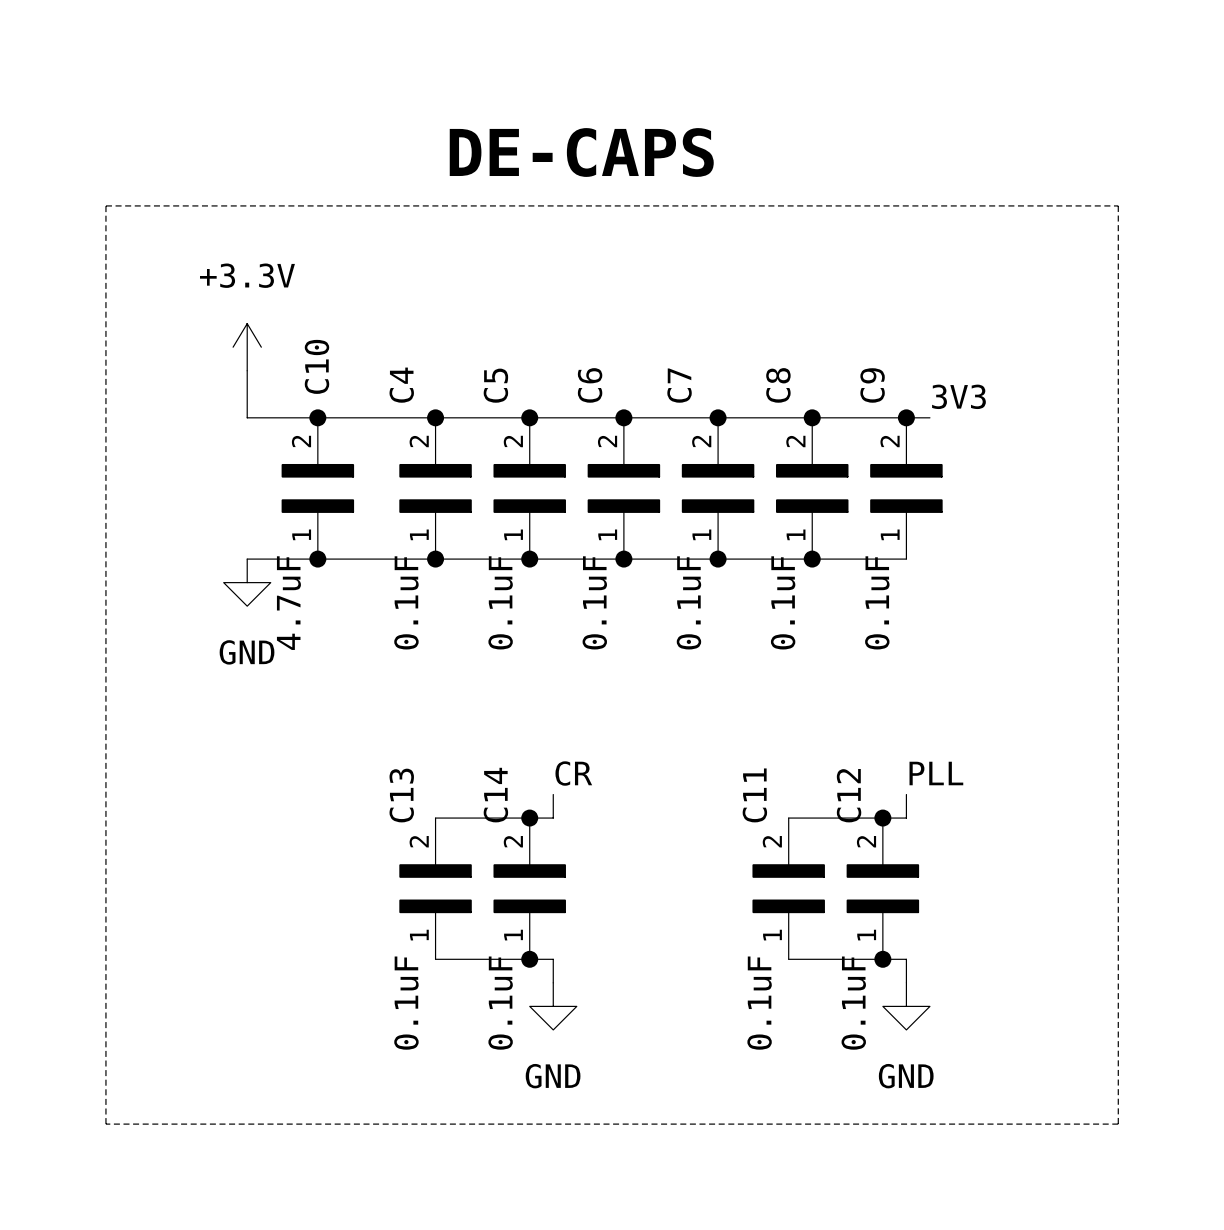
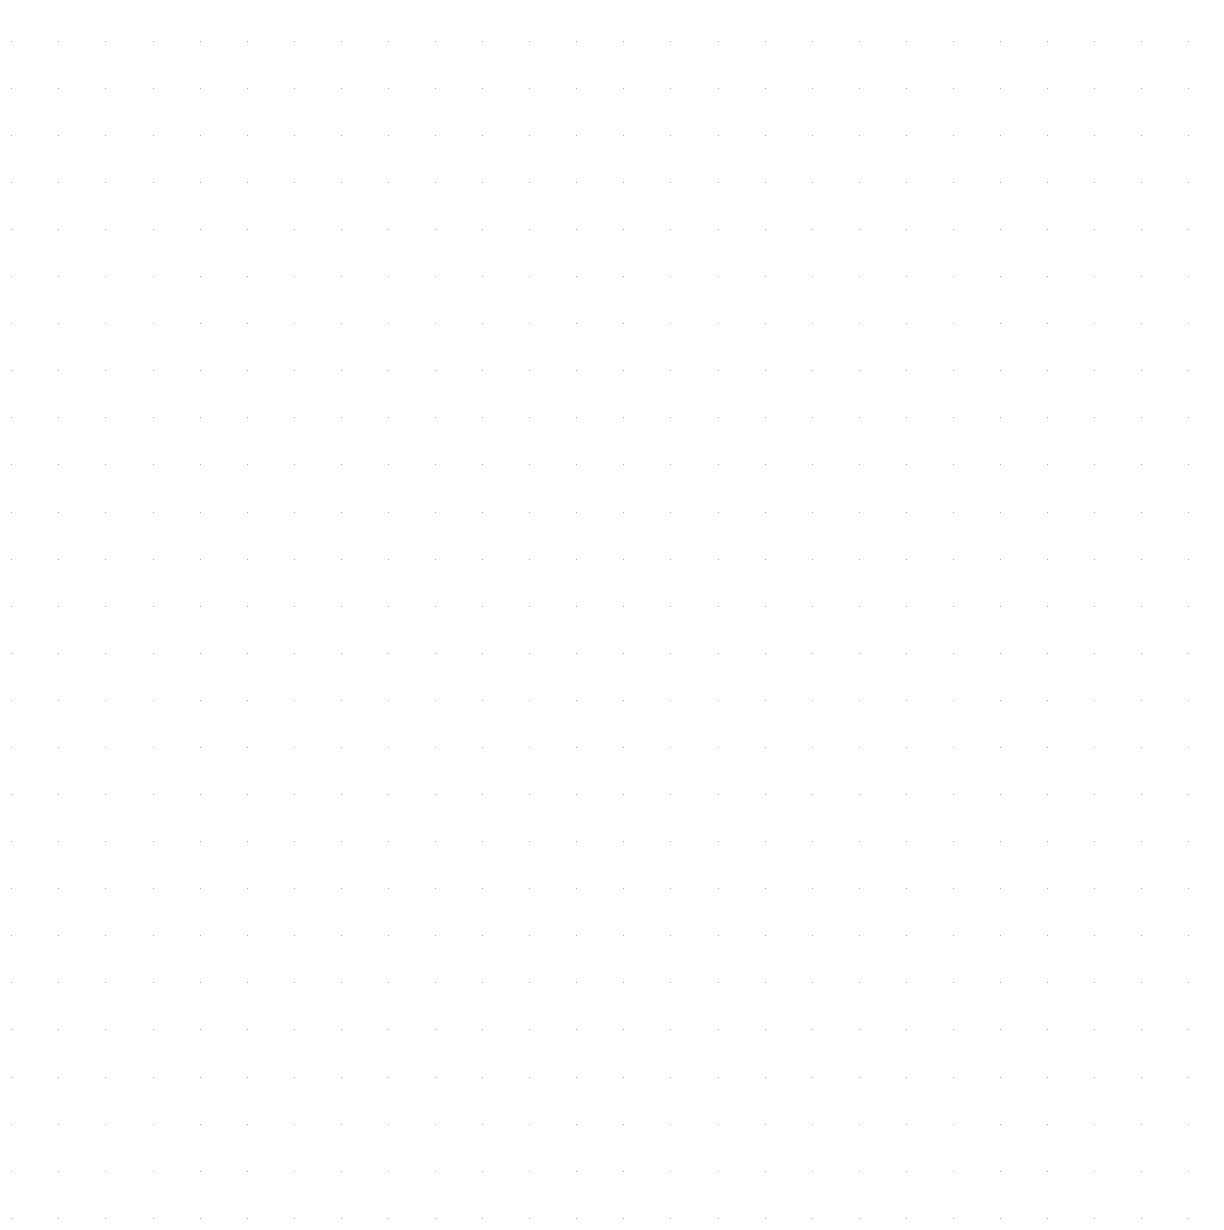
text: DE-CAPS (581, 152) -> none
line: (105, 205) (1118, 205) (1118, 1124) (105, 1124) (105, 205) -> none
power symbol: +3.3V (247, 347) -> none
wire: (247, 370) (247, 417) (929, 417) -> none
label: 3V3 (958, 396) -> none
junction: (317, 417) -> none
junction: (435, 417) -> none
junction: (529, 417) -> none
junction: (623, 417) -> none
junction: (718, 417) -> none
junction: (812, 417) -> none
junction: (906, 417) -> none
C10: 4.7uF (317, 488) -> none
C4: 0.1uF (435, 488) -> none
C5: 0.1uF (529, 488) -> none
C6: 0.1uF (623, 488) -> none
C7: 0.1uF (718, 488) -> none
C8: 0.1uF (812, 488) -> none
C9: 0.1uF (906, 488) -> none
wire: (247, 559) (906, 559) -> none
junction: (317, 559) -> none
junction: (435, 559) -> none
junction: (529, 559) -> none
junction: (623, 559) -> none
junction: (718, 559) -> none
junction: (812, 559) -> none
power symbol: GND (247, 582) -> none
label: CR (573, 773) -> none
label: PLL (936, 773) -> none
wire: (553, 794) (553, 818) (435, 818) -> none
wire: (906, 794) (906, 818) (788, 818) -> none
junction: (529, 818) -> none
junction: (882, 818) -> none
C13: 0.1uF (435, 888) -> none
C14: 0.1uF (529, 888) -> none
C11: 0.1uF (788, 888) -> none
C12: 0.1uF (882, 888) -> none
wire: (435, 959) (553, 959) (553, 982) -> none
junction: (529, 959) -> none
wire: (788, 959) (906, 959) (906, 982) -> none
junction: (882, 959) -> none
power symbol: GND (553, 1006) -> none
power symbol: GND (906, 1006) -> none

